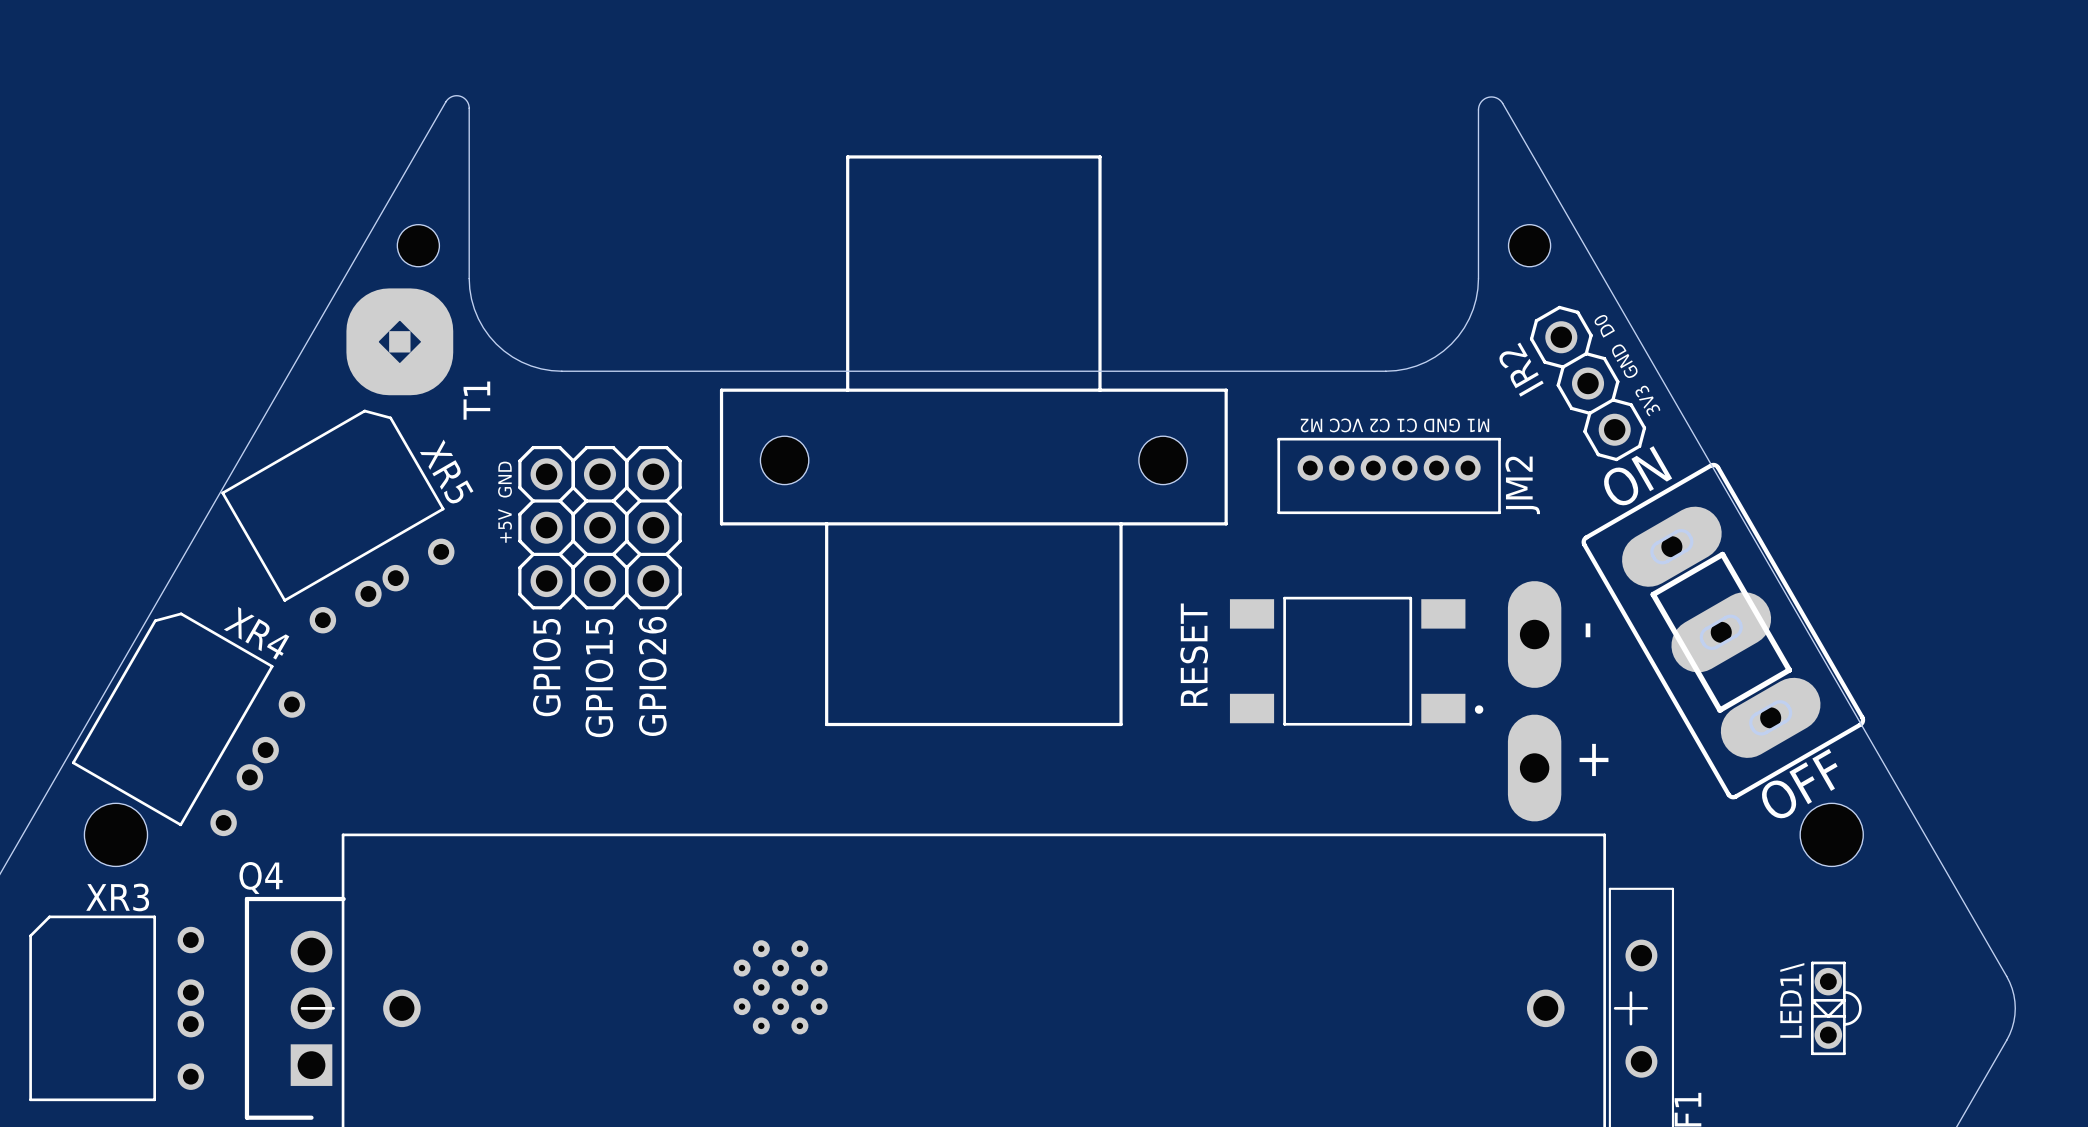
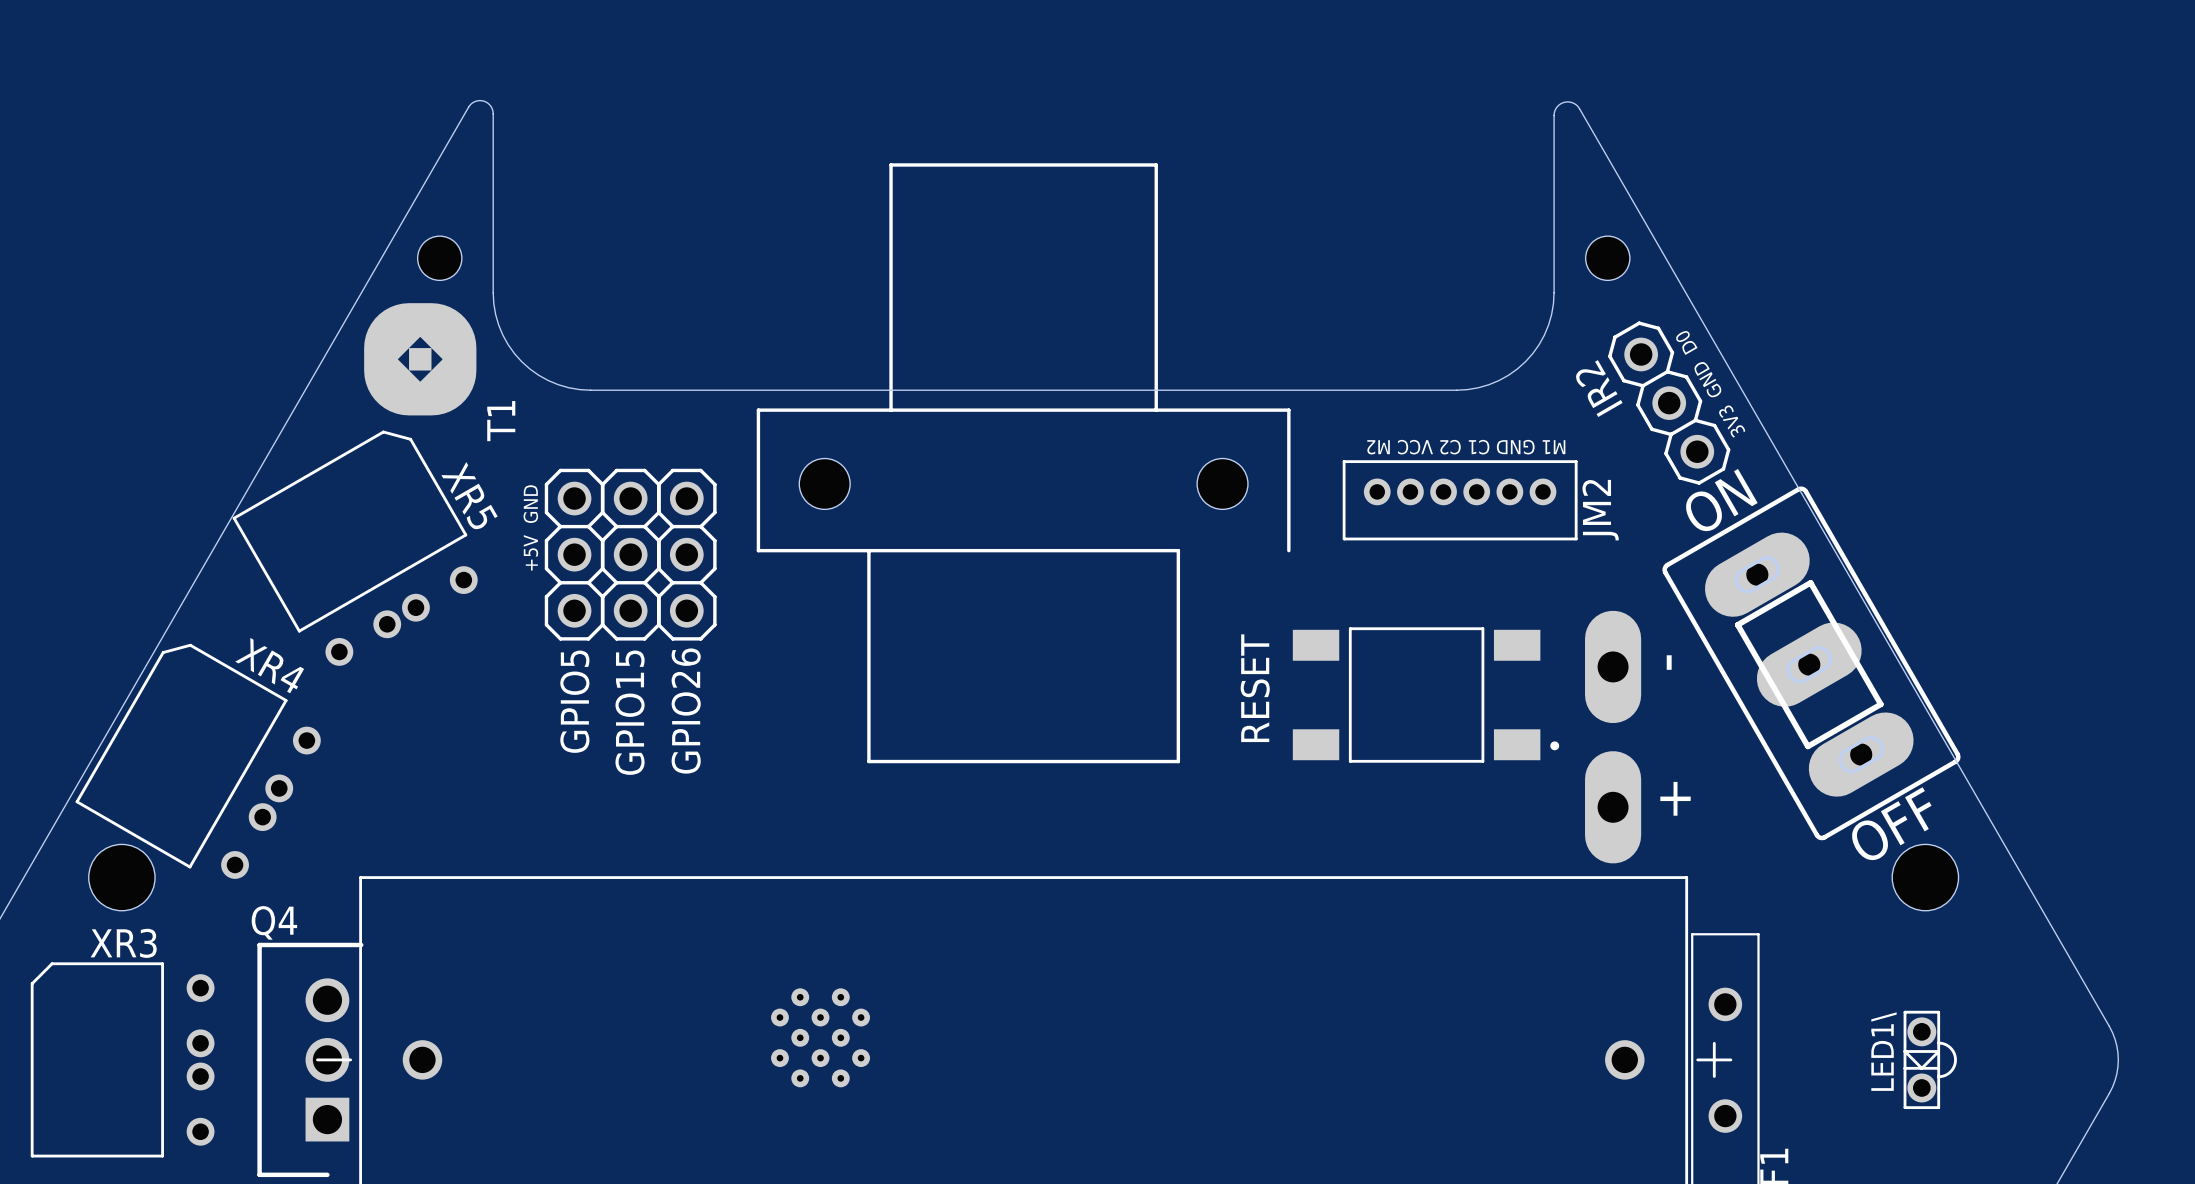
line: (1121, 523) (1226, 523) -> none

